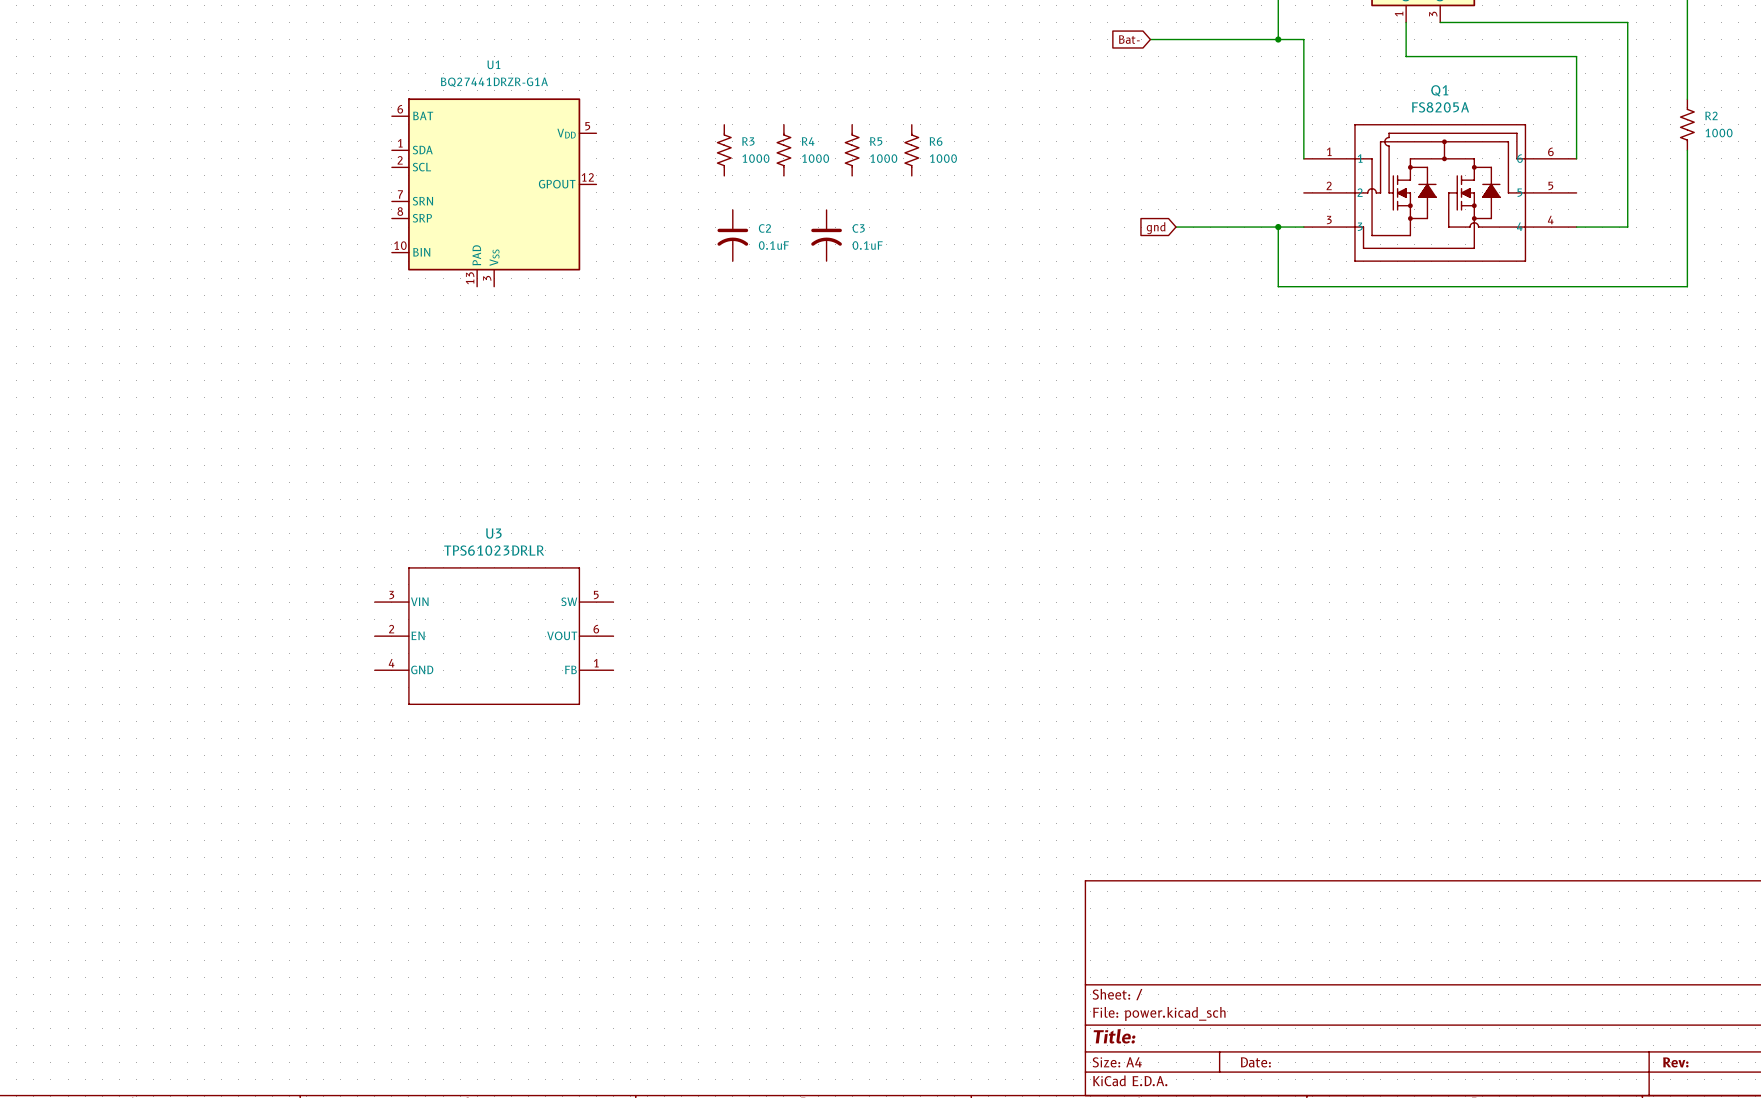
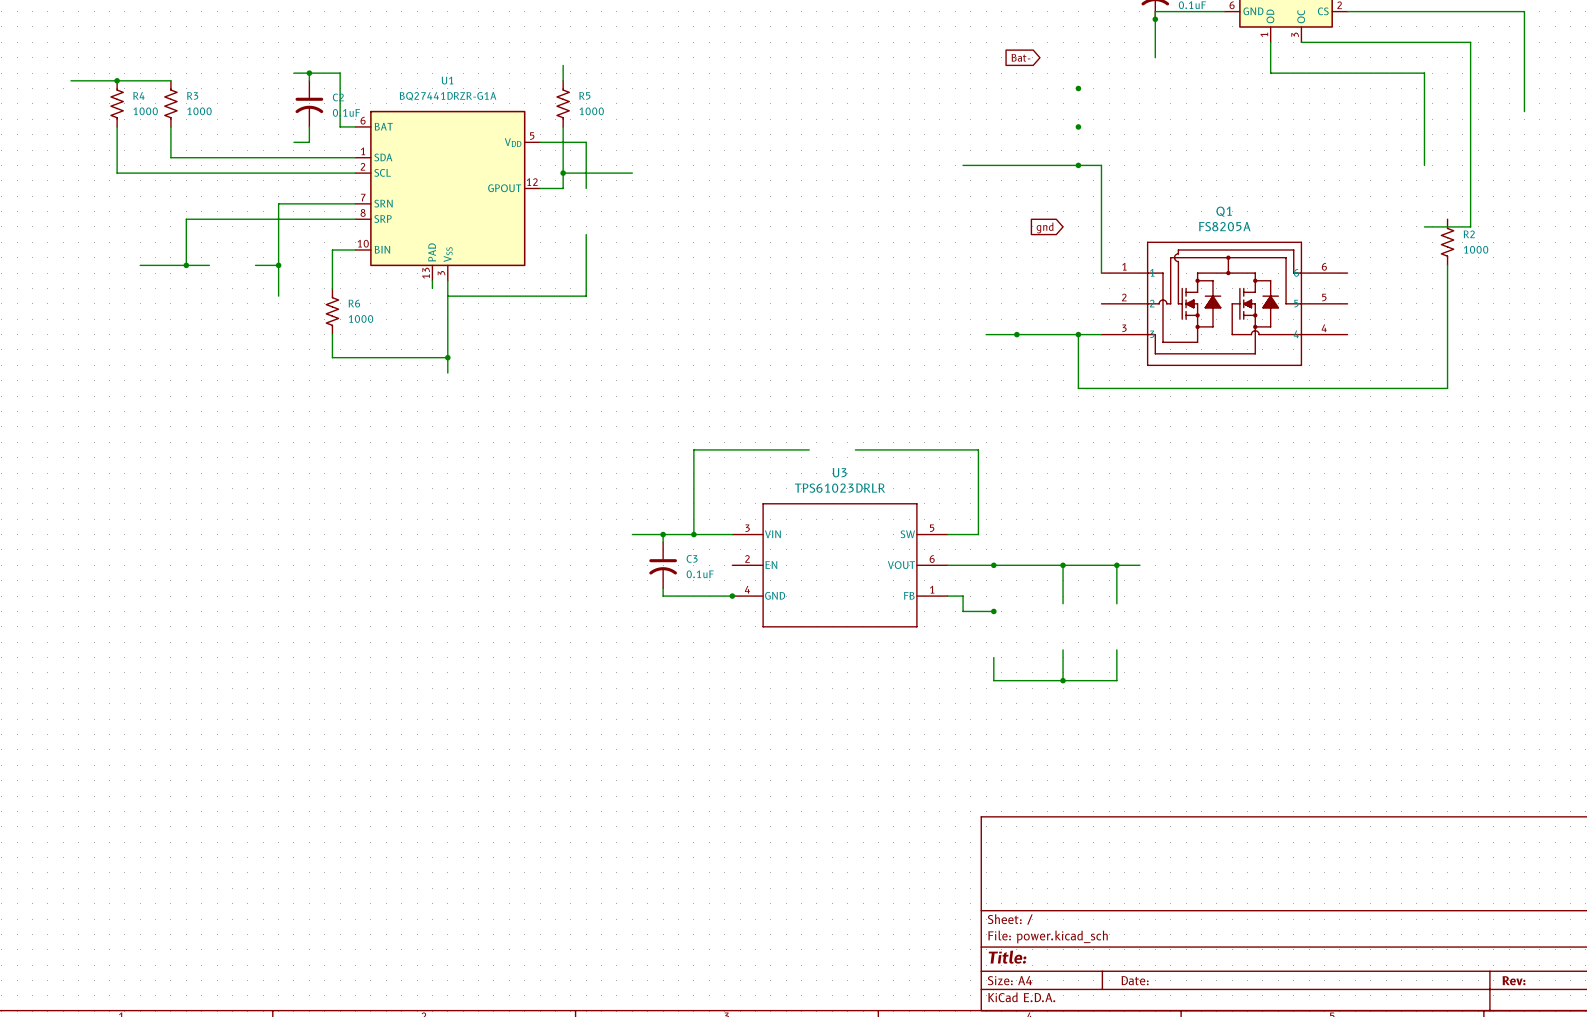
wire: (1150, 39) (1303, 39) (1303, 158) -> (963, 165) (1101, 165) (1101, 273)
junction: (1278, 39) -> none
wire: none -> (563, 65) (563, 80)
wire: none -> (293, 73) (340, 73) (340, 126) (355, 126)
wire: none -> (309, 73) (309, 80)
junction: none -> (309, 73)
wire: none -> (70, 80) (170, 80)
junction: none -> (117, 80)
junction: none -> (1078, 88)
wire: none -> (117, 126) (117, 173) (355, 173)
wire: none -> (170, 126) (170, 157) (355, 157)
wire: none -> (309, 126) (309, 142) (293, 142)
wire: none -> (563, 126) (563, 188) (540, 188)
junction: none -> (1078, 126)
R2 position: (1687, 124) -> (1447, 242)
wire: none -> (540, 142) (586, 142) (586, 188)
R3 position: (724, 150) -> (170, 103)
R4 position: (783, 150) -> (117, 103)
R5 position: (852, 150) -> (563, 103)
R6 position: (911, 150) -> (332, 311)
wire: (1687, 150) (1687, 286) (1278, 286) (1278, 227) -> (1447, 265) (1447, 388) (1078, 388) (1078, 334)
junction: none -> (1078, 165)
wire: none -> (563, 173) (632, 173)
junction: none -> (563, 173)
Q1 position: (1440, 192) -> (1224, 303)
wire: none -> (355, 203) (278, 203) (278, 296)
wire: none -> (355, 219) (186, 219) (186, 265)
wire: (1176, 227) (1303, 227) -> (986, 334) (1101, 334)
junction: (1278, 227) -> none
wire: none -> (586, 234) (586, 296) (447, 296)
C2 position: (732, 235) -> (309, 103)
C3 position: (826, 235) -> (663, 565)
wire: none -> (355, 250) (332, 250) (332, 288)
wire: none -> (140, 265) (209, 265)
junction: none -> (186, 265)
wire: none -> (255, 265) (278, 265)
junction: none -> (278, 265)
wire: none -> (432, 280) (432, 288)
wire: none -> (447, 280) (447, 373)
wire: none -> (332, 334) (332, 357) (447, 357)
junction: none -> (1016, 334)
junction: none -> (1078, 334)
junction: none -> (447, 357)
wire: none -> (809, 449) (693, 449) (693, 534)
wire: none -> (855, 449) (978, 449) (978, 534) (947, 534)
wire: none -> (632, 534) (732, 534)
wire: none -> (663, 534) (663, 542)
junction: none -> (663, 534)
junction: none -> (693, 534)
wire: none -> (947, 565) (1139, 565)
junction: none -> (993, 565)
wire: none -> (1063, 565) (1063, 603)
junction: none -> (1063, 565)
wire: none -> (1116, 565) (1116, 603)
junction: none -> (1116, 565)
wire: none -> (663, 588) (663, 596) (732, 596)
U3 position: (494, 636) -> (840, 565)
junction: none -> (732, 596)
wire: none -> (947, 596) (963, 596) (963, 611) (993, 611)
junction: none -> (993, 611)
wire: none -> (1063, 649) (1063, 680)
wire: none -> (1116, 649) (1116, 680) (993, 680) (993, 657)
junction: none -> (1063, 680)

